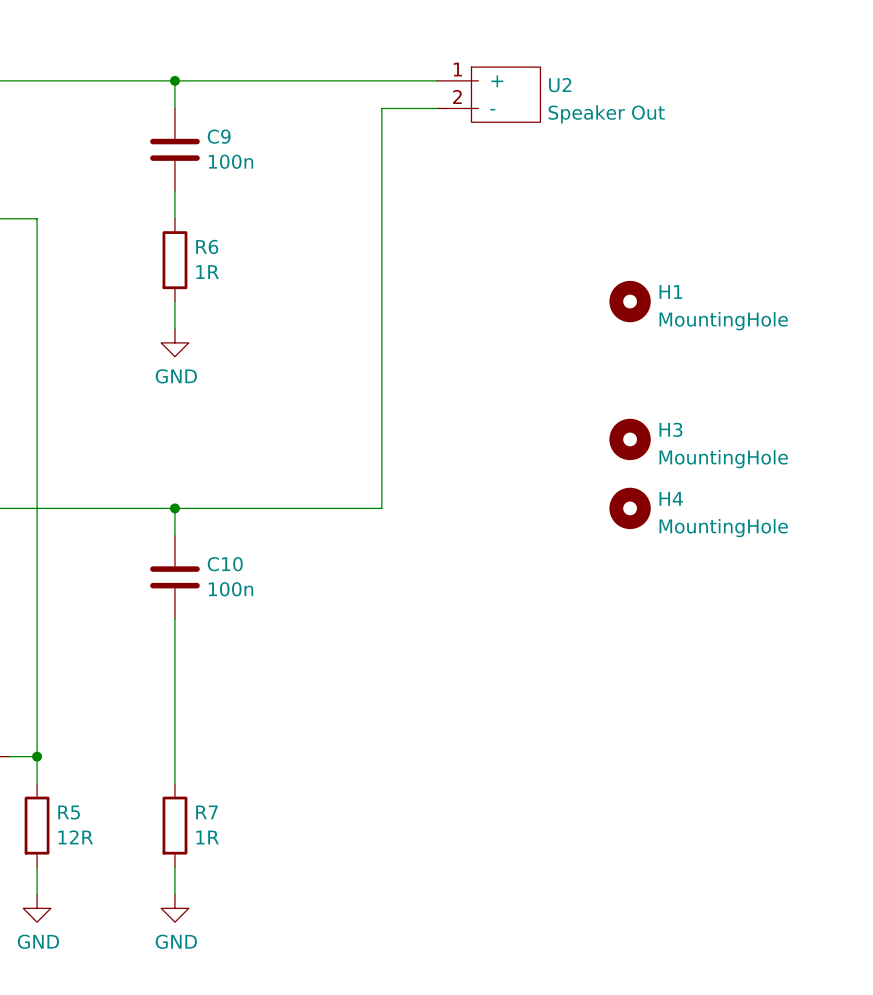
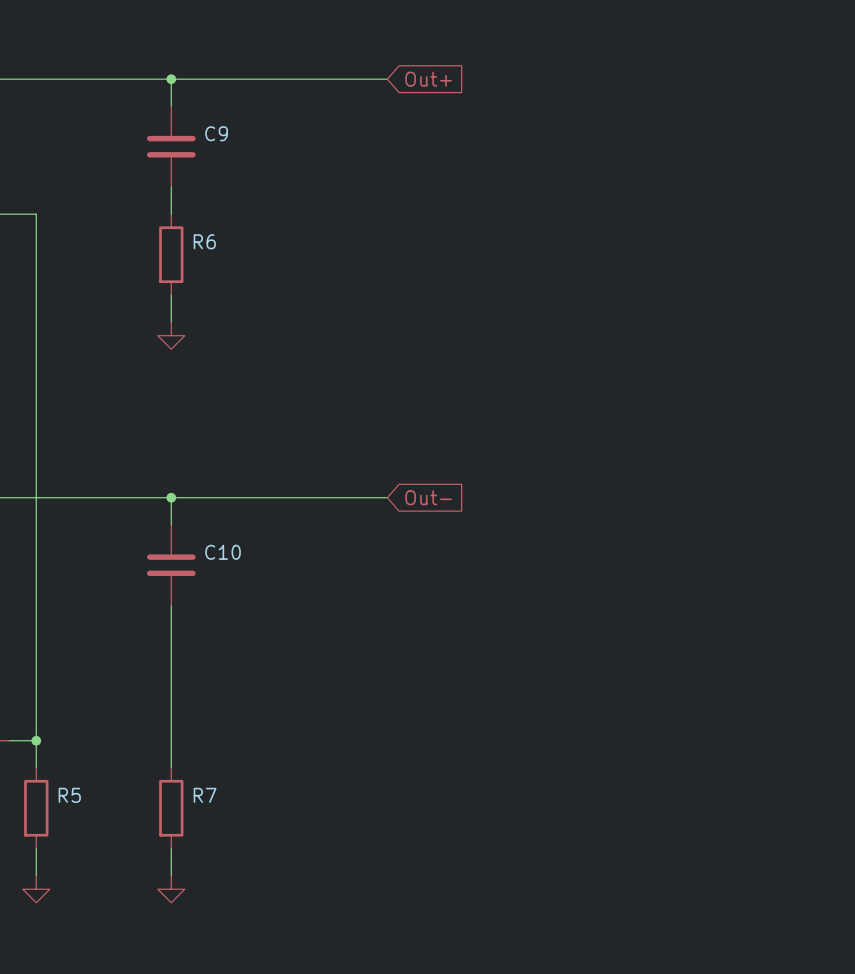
wire: (395, 80) (437, 80) -> none
global label: none -> Out+ (428, 79)
U2: Speaker Out (488, 94) -> none
wire: (437, 108) (381, 108) (381, 508) -> (387, 497) (373, 497)
C9 value: 100n (230, 161) -> none
R6 value: 1R (207, 272) -> none
H1: MountingHole (630, 301) -> none
power symbol text: GND (176, 376) -> none
H3: MountingHole (630, 439) -> none
global label: none -> Out- (428, 497)
H4: MountingHole (630, 508) -> none
C10 value: 100n (230, 589) -> none
R5 value: 12R (75, 837) -> none
R7 value: 1R (207, 837) -> none
power symbol text: GND (38, 941) -> none
power symbol text: GND (176, 941) -> none

